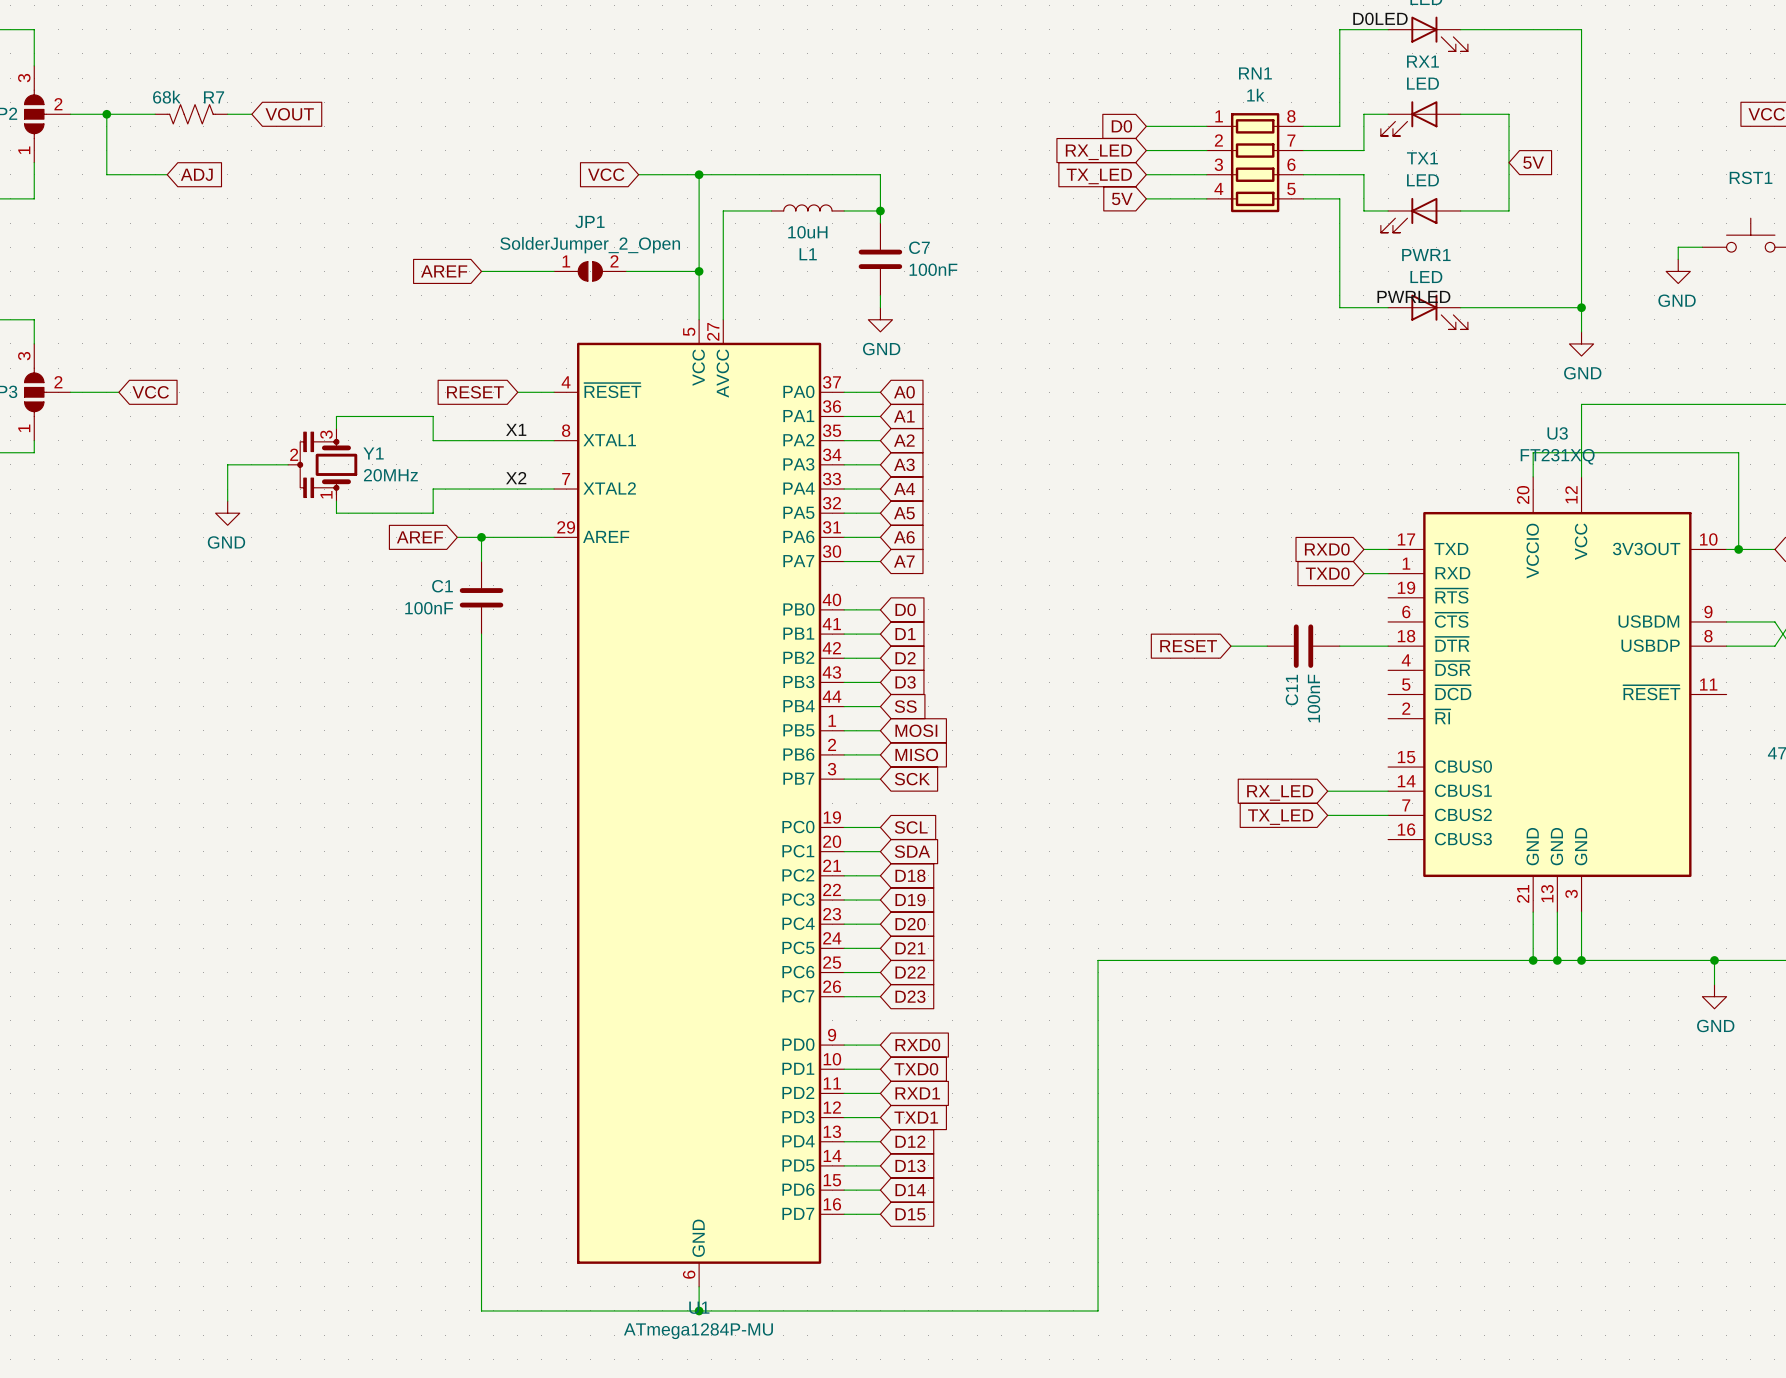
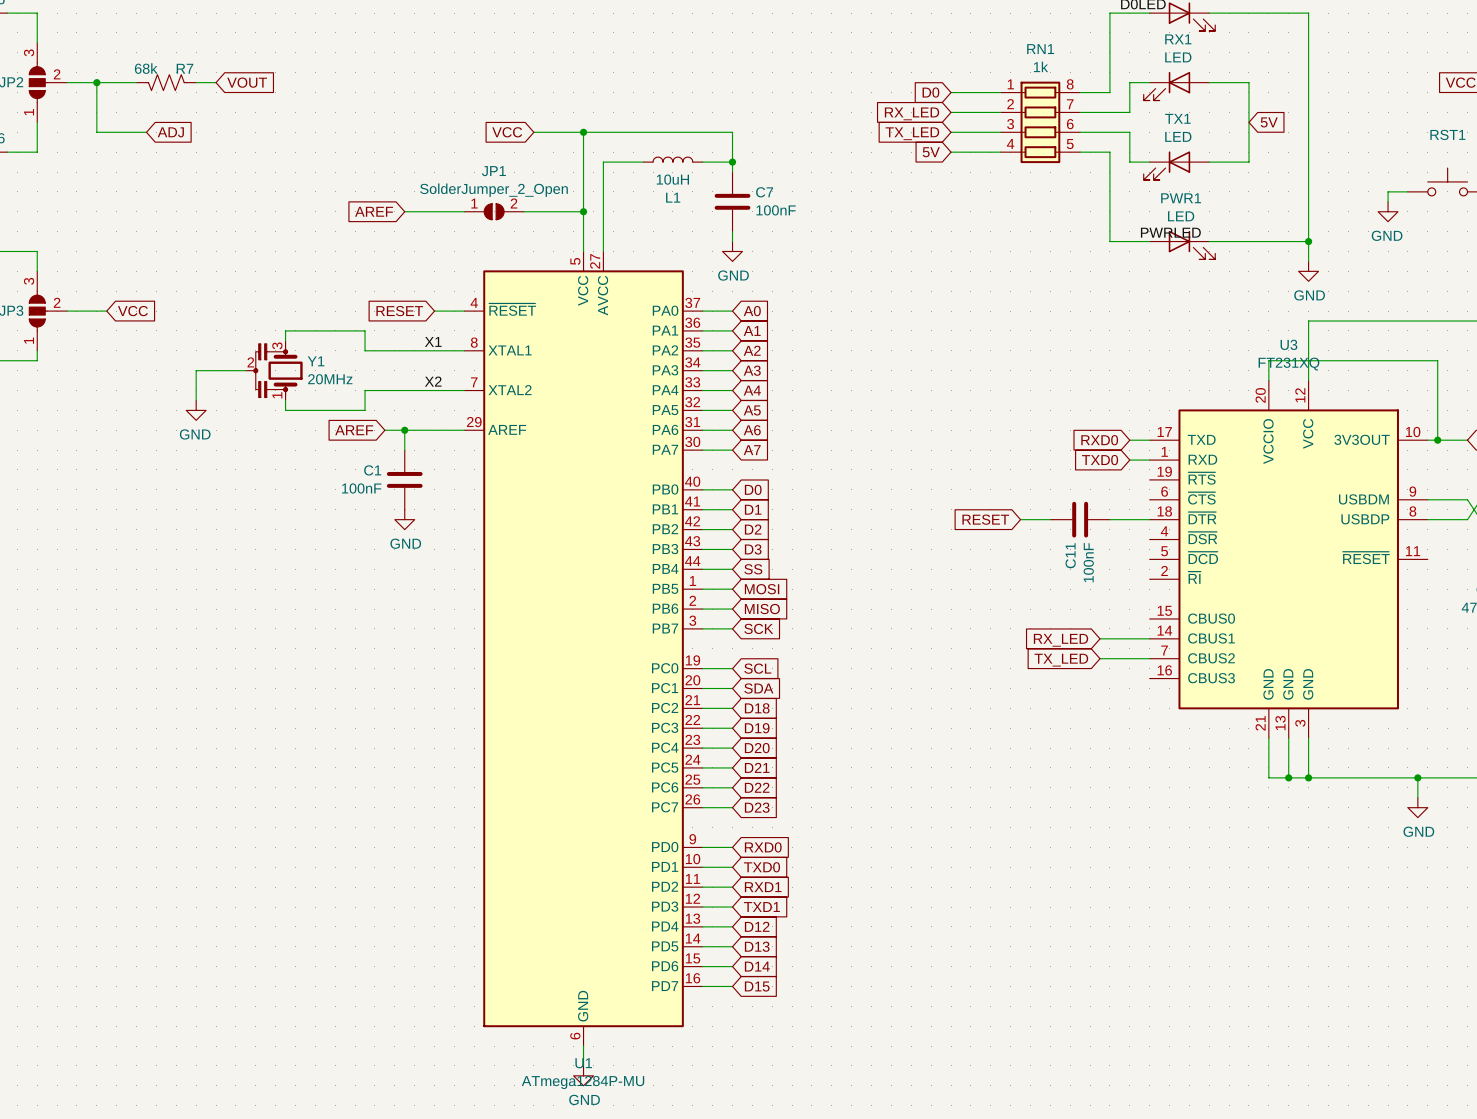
wire: (481, 634) (481, 1310) (1098, 1310) (1098, 960) (1533, 960) -> none
power symbol: none -> GND (404, 519)
junction: (1533, 960) -> none
junction: (699, 1310) -> none
power symbol: none -> GND (583, 1075)

